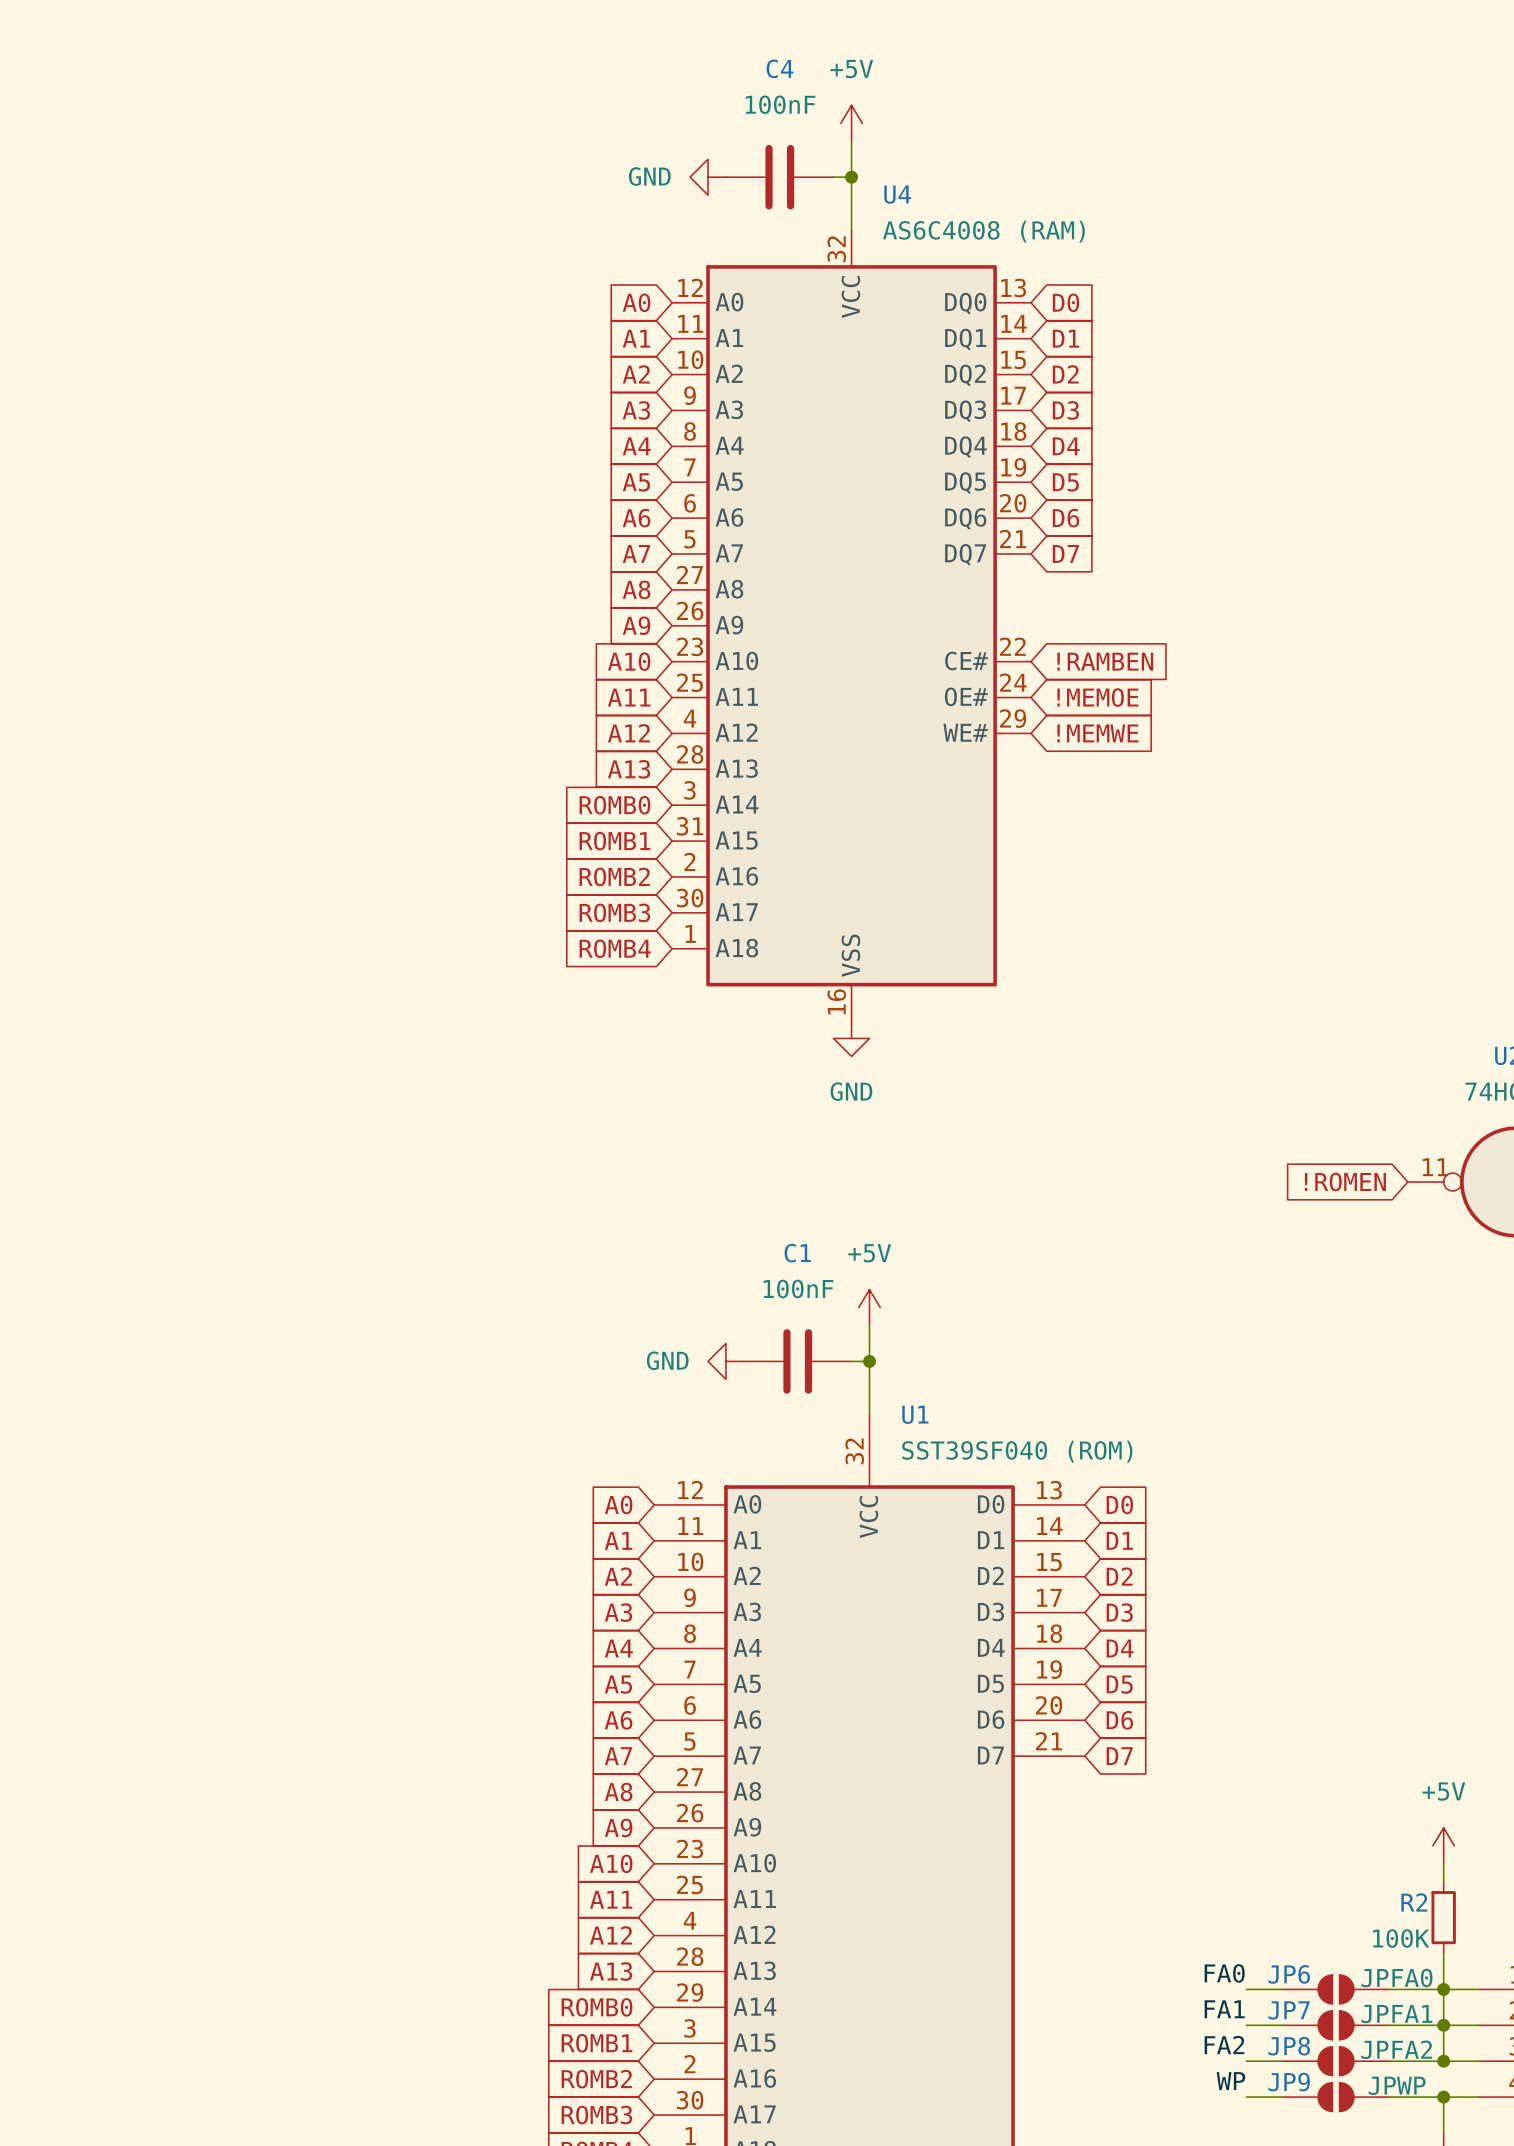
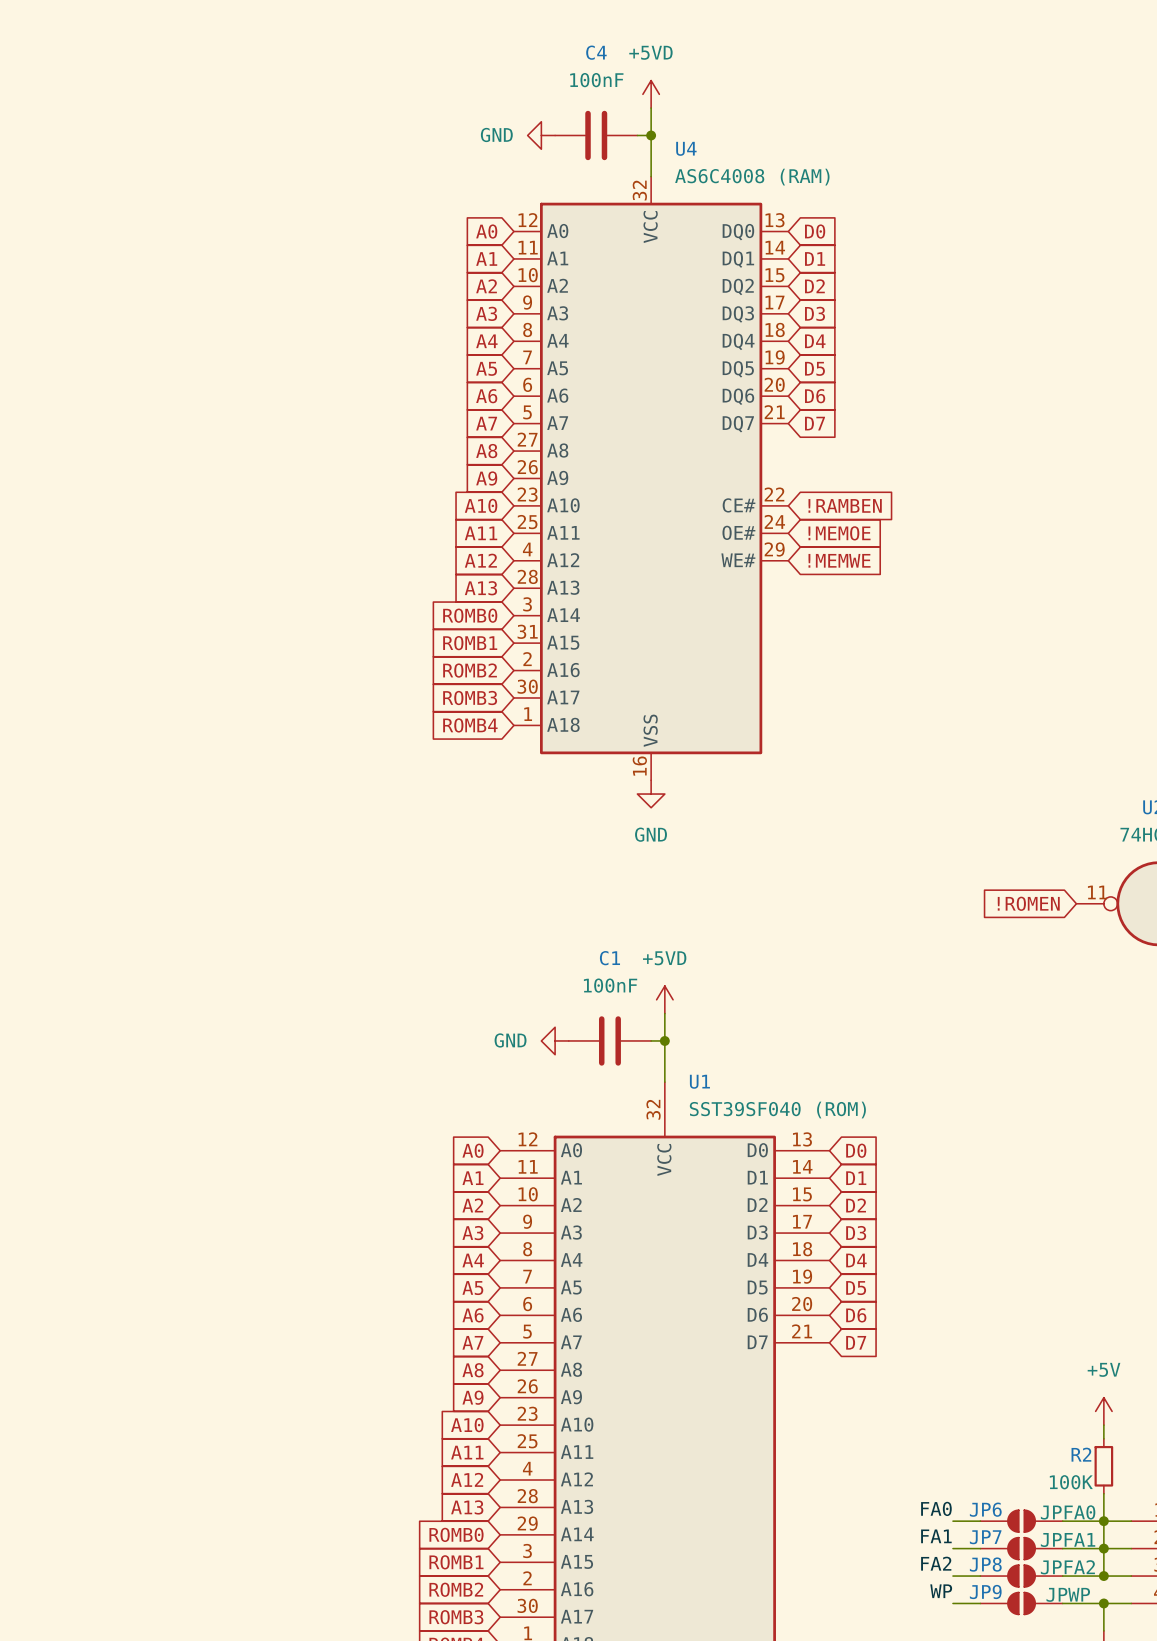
power symbol: +5V (851, 123) -> +5VD (651, 94)
power symbol: +5V (869, 1307) -> +5VD (664, 999)

